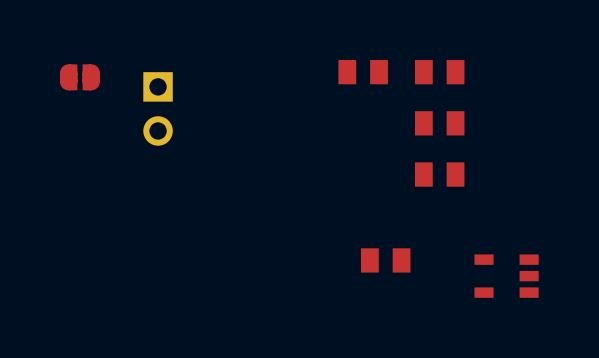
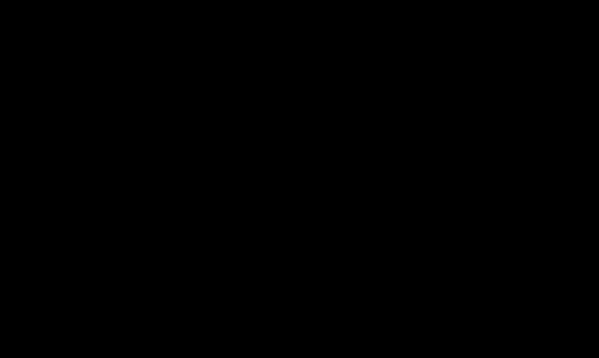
part: (363, 72) -> none
part: (439, 72) -> none
part: (79, 77) -> none
part: (158, 108) -> none
part: (439, 123) -> none
part: (439, 174) -> none
part: (385, 260) -> none
part: (506, 276) -> none

